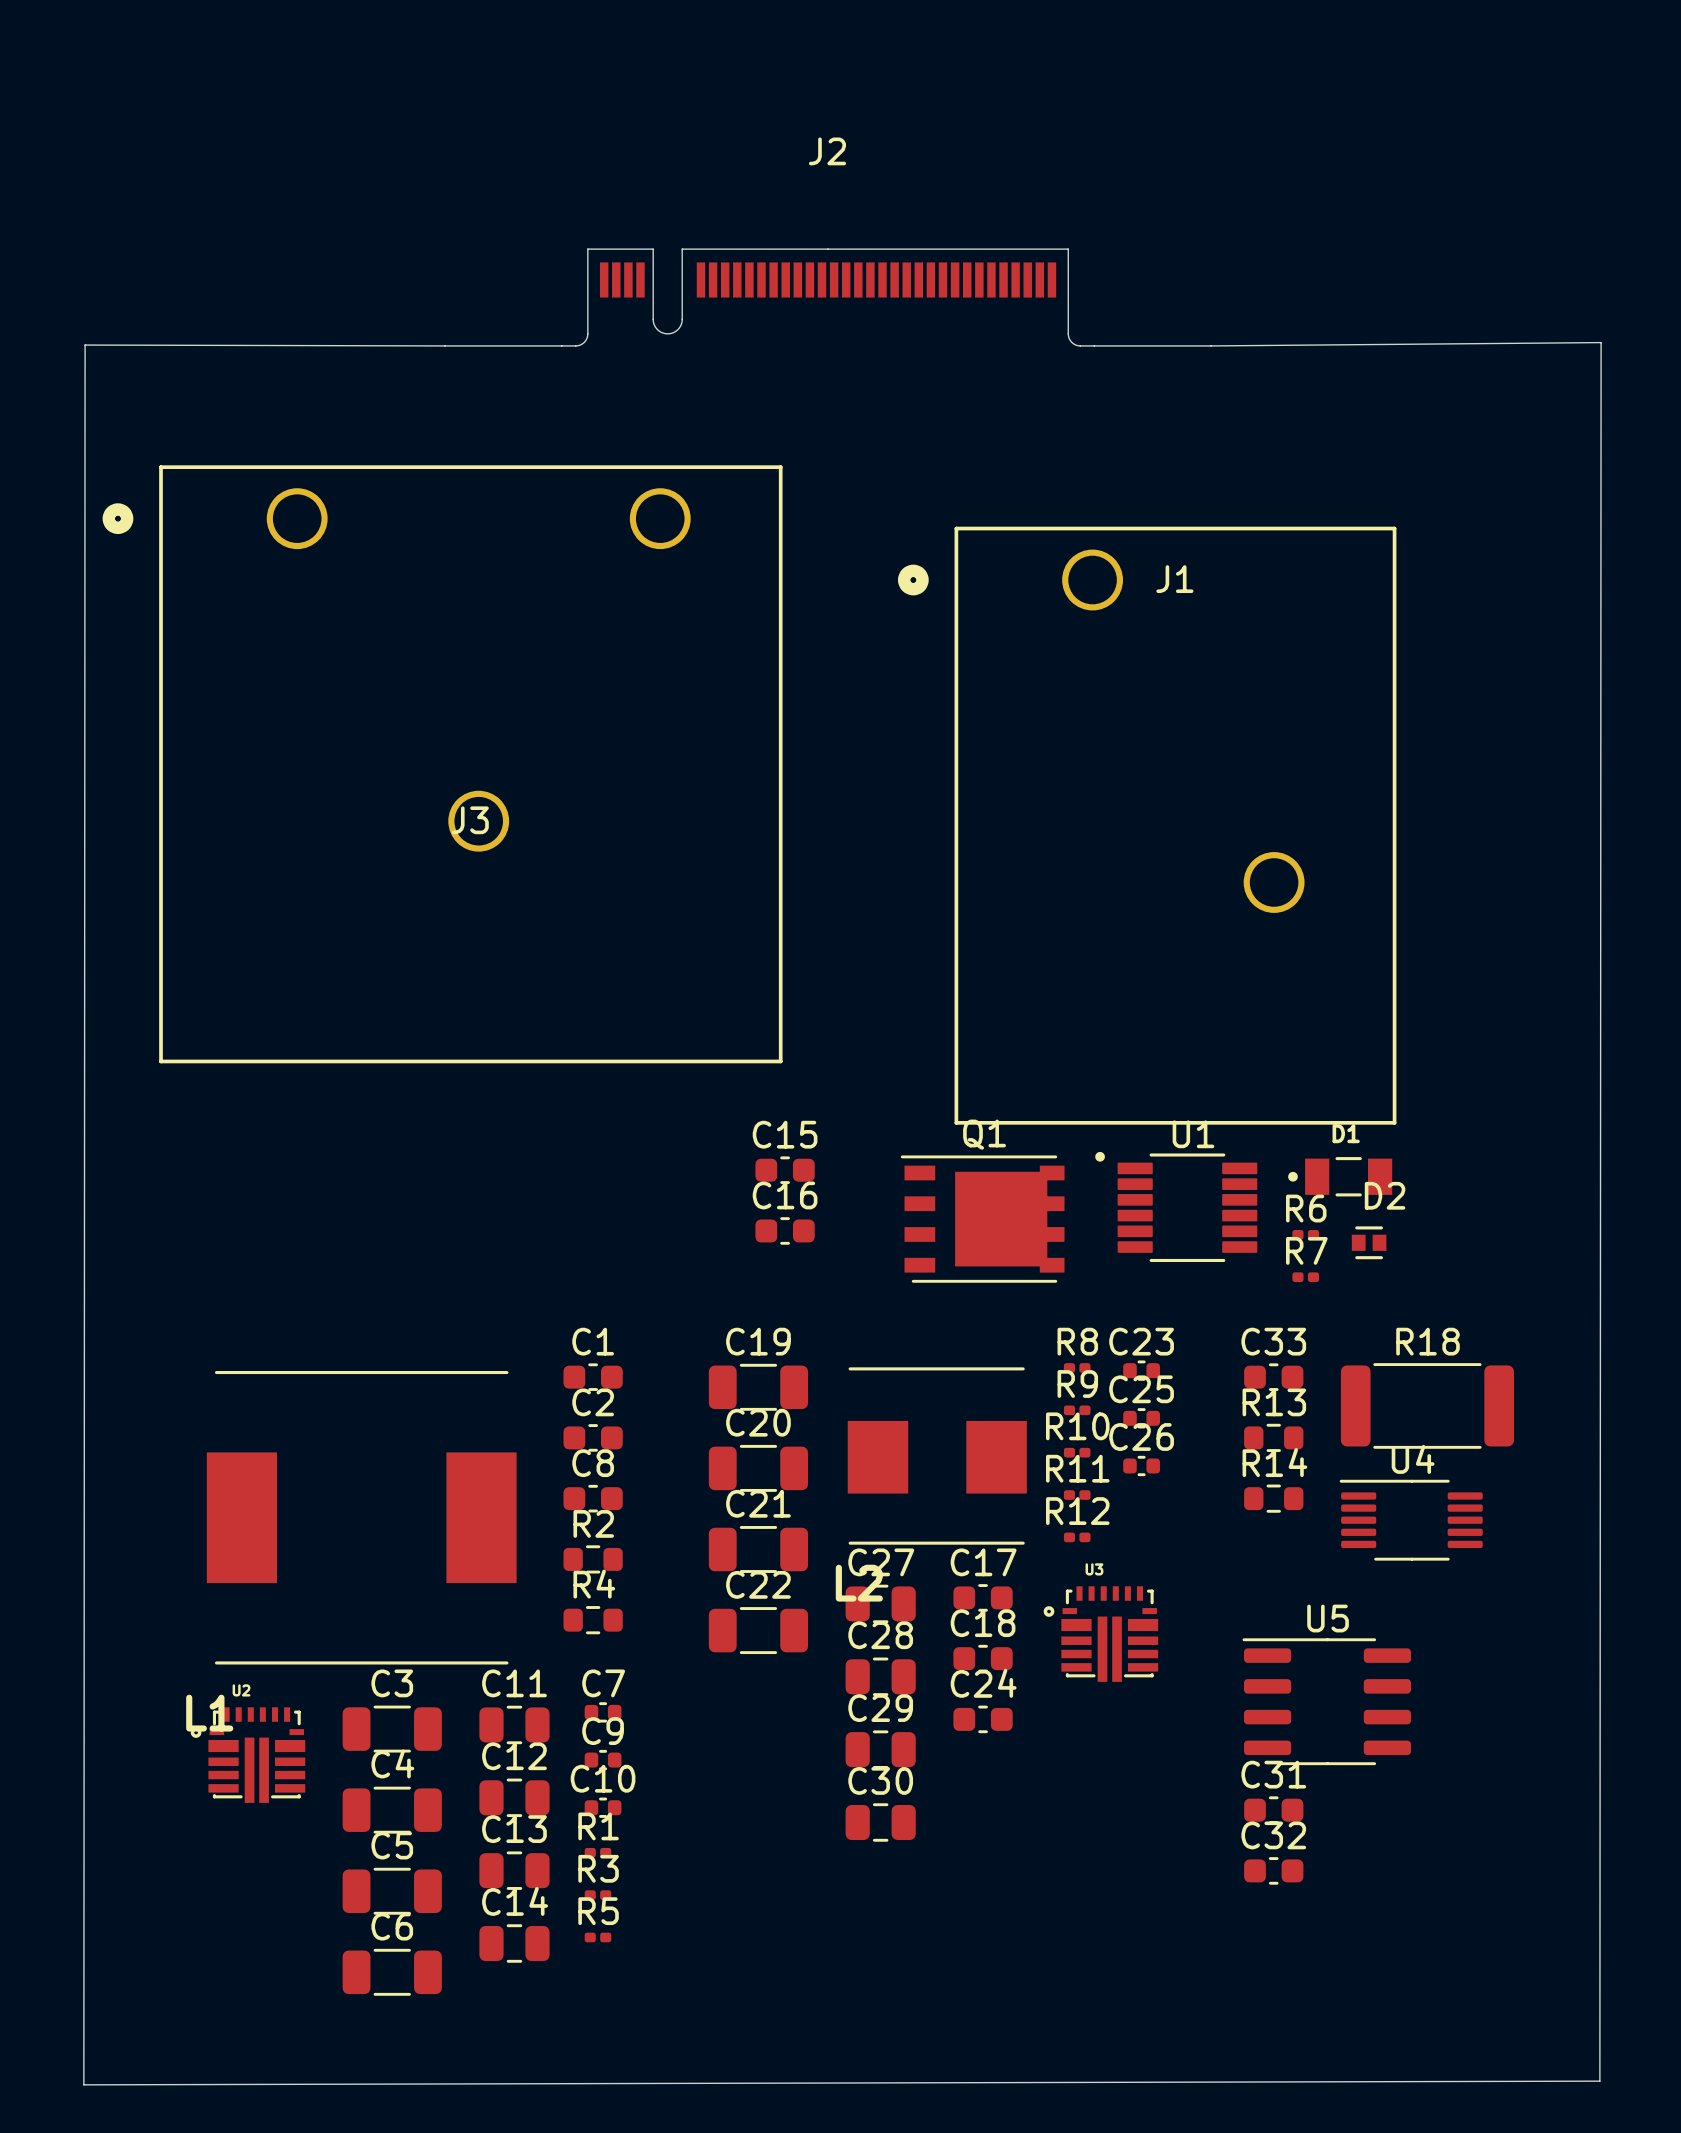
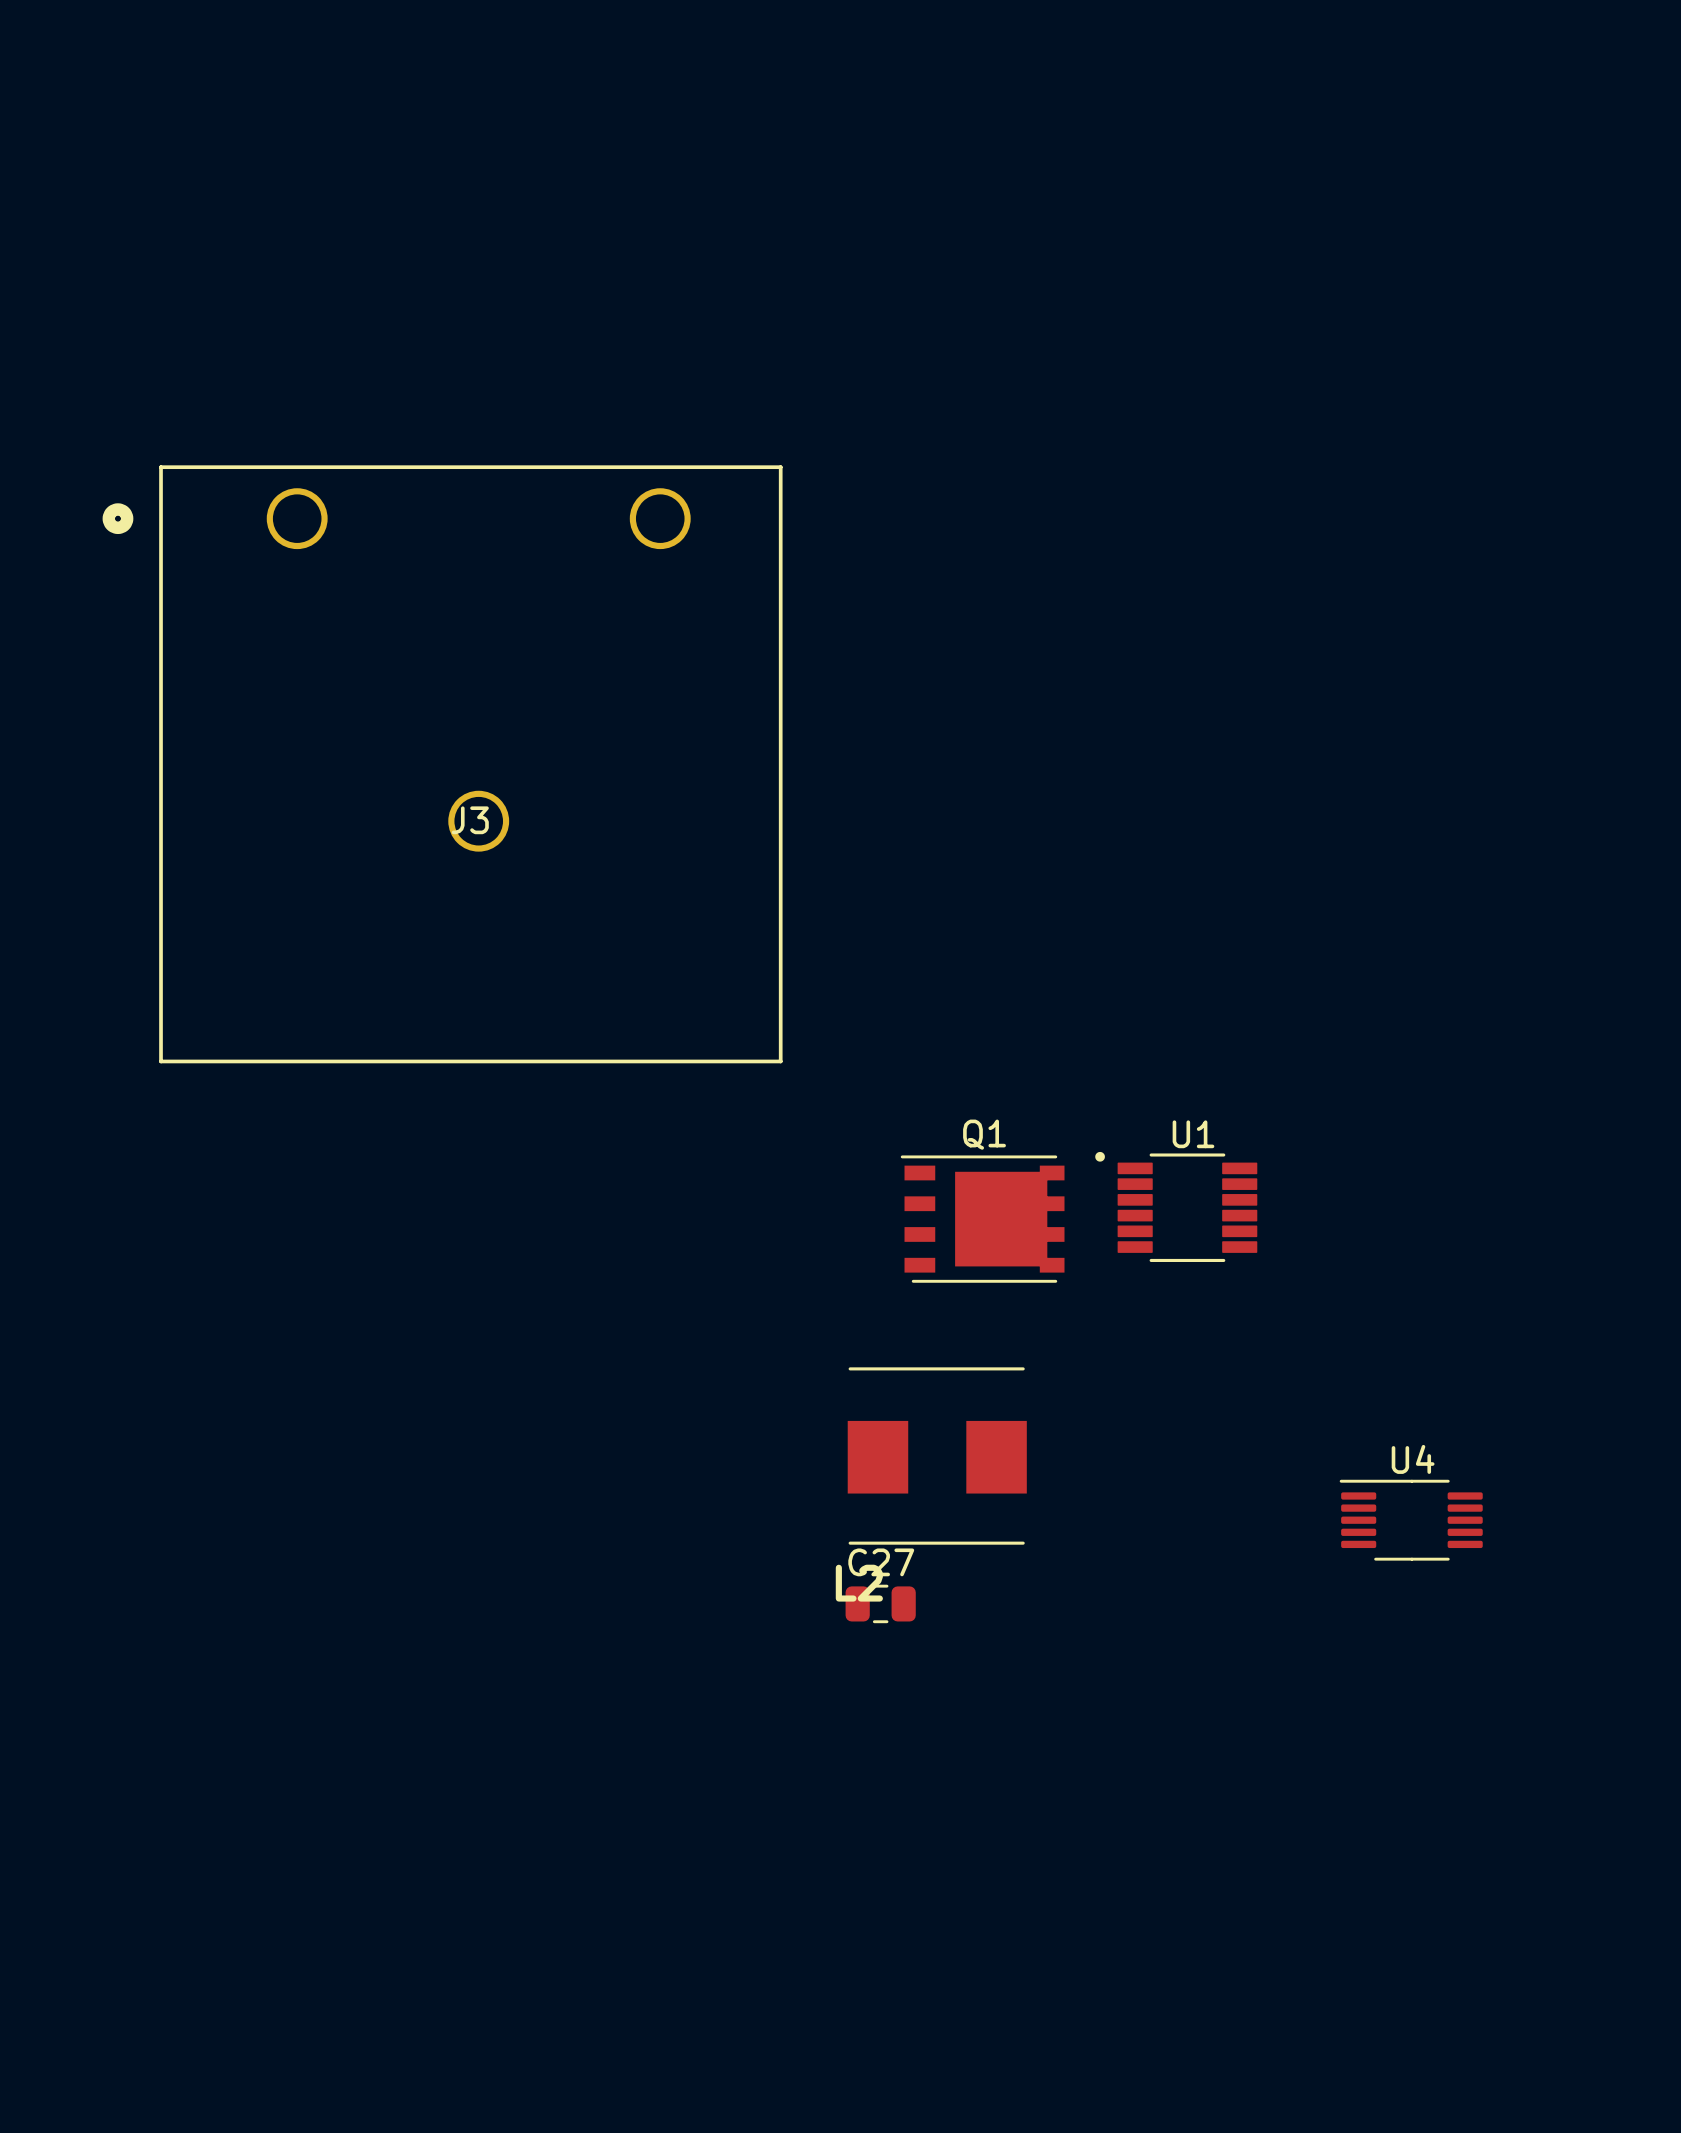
J2: (828, 297) -> none
board edge: (561, 345) (85, 345) (83, 2084) (1599, 2081) (1601, 342) (1094, 345) -> none
J1: (1147, 825) -> none
C15: (785, 1170) -> none
D1: (1340, 1176) -> none
C16: (785, 1230) -> none
R6: (1305, 1234) -> none
D2: (1369, 1242) -> none
R7: (1305, 1277) -> none
R8: (1077, 1367) -> none
C23: (1141, 1370) -> none
C1: (593, 1377) -> none
C33: (1273, 1377) -> none
C19: (758, 1387) -> none
R18: (1427, 1405) -> none
R9: (1077, 1410) -> none
C25: (1141, 1418) -> none
C2: (593, 1437) -> none
R13: (1273, 1437) -> none
R10: (1077, 1452) -> none
C26: (1141, 1465) -> none
C20: (758, 1468) -> none
R11: (1077, 1495) -> none
C8: (593, 1498) -> none
R14: (1273, 1498) -> none
L1: (361, 1517) -> none
R12: (1077, 1537) -> none
C21: (758, 1549) -> none
R2: (593, 1559) -> none
C17: (983, 1597) -> none
R4: (593, 1620) -> none
C22: (758, 1630) -> none
U3: (1100, 1634) -> none
C18: (983, 1658) -> none
C28: (880, 1676) -> none
U5: (1326, 1701) -> none
C7: (603, 1712) -> none
C24: (983, 1719) -> none
C11: (514, 1724) -> none
C3: (392, 1729) -> none
C29: (880, 1749) -> none
U2: (247, 1755) -> none
C9: (603, 1760) -> none
C12: (514, 1797) -> none
C10: (603, 1807) -> none
C4: (392, 1810) -> none
C31: (1273, 1810) -> none
C30: (880, 1822) -> none
R1: (597, 1852) -> none
C13: (514, 1870) -> none
C32: (1273, 1870) -> none
C5: (392, 1891) -> none
R3: (597, 1895) -> none
R5: (597, 1937) -> none
C14: (514, 1943) -> none
C6: (392, 1972) -> none

